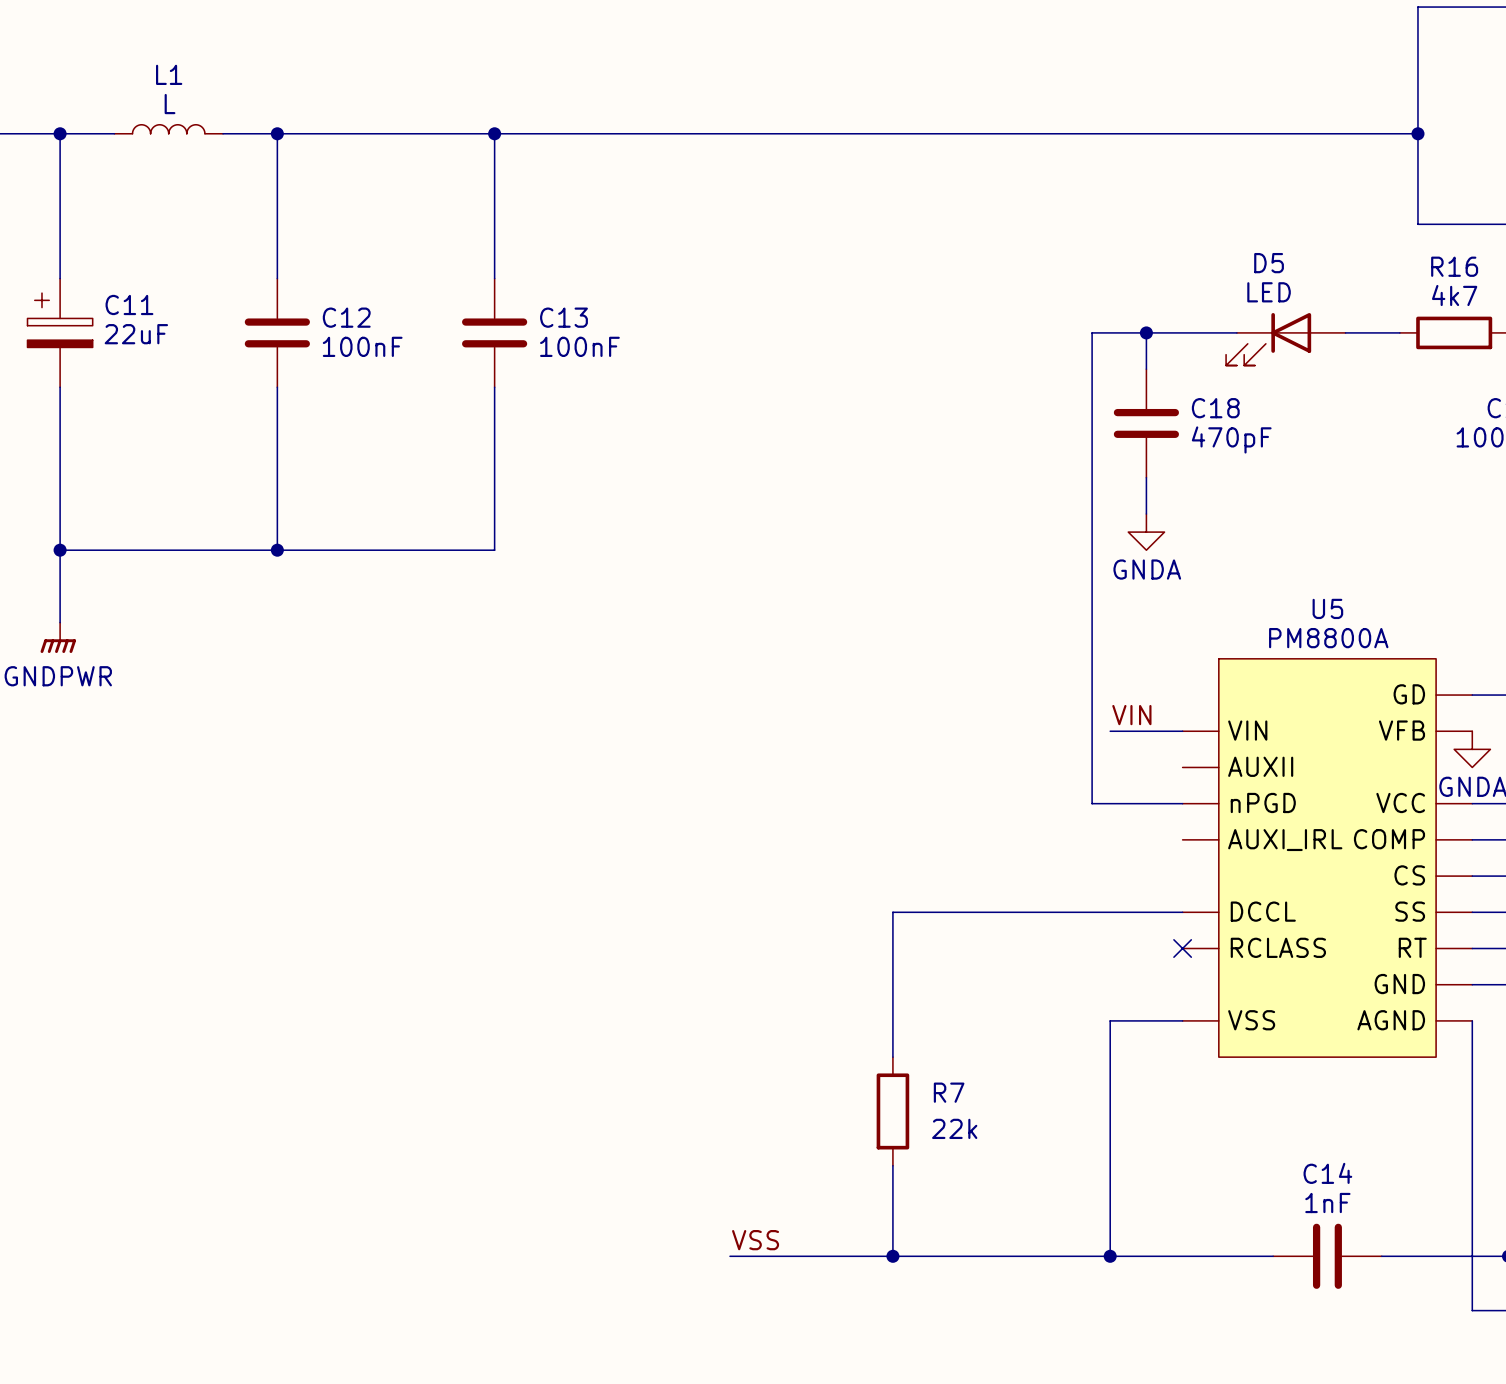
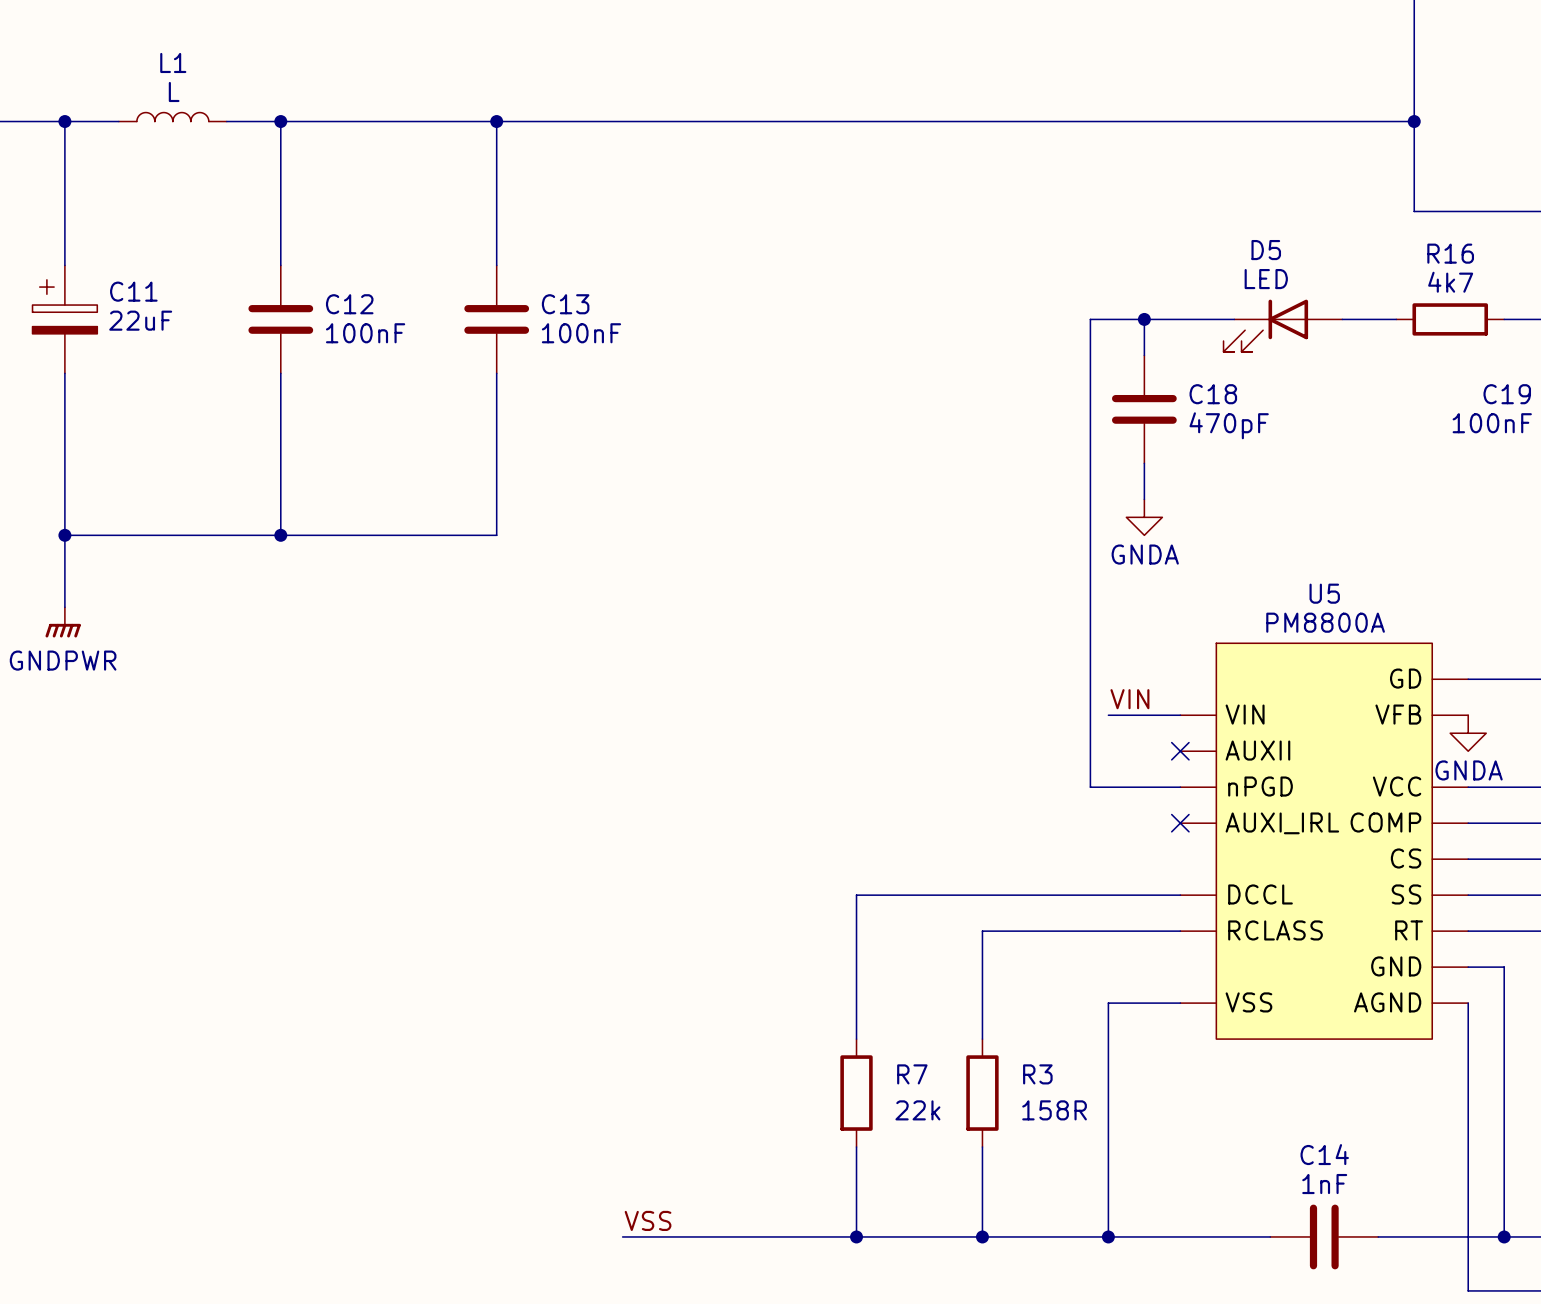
no-connect mark: none -> (1180, 751)
no-connect mark: none -> (1180, 823)
wire: (892, 912) (892, 1057) -> (892, 895) (856, 895) (856, 1039)
wire: none -> (1180, 931) (982, 931) (982, 1039)
no-connect mark: (1182, 948) -> none
R7 position: (892, 1111) -> (856, 1093)
R3: none -> 158R (982, 1093)
wire: (892, 1165) (892, 1256) -> (856, 1147) (856, 1236)
wire: none -> (982, 1147) (982, 1236)
label position: VSS (755, 1240) -> VSS (648, 1220)
wire: none -> (622, 1236) (730, 1236)
junction position: (892, 1256) -> (856, 1236)
junction: none -> (982, 1236)

